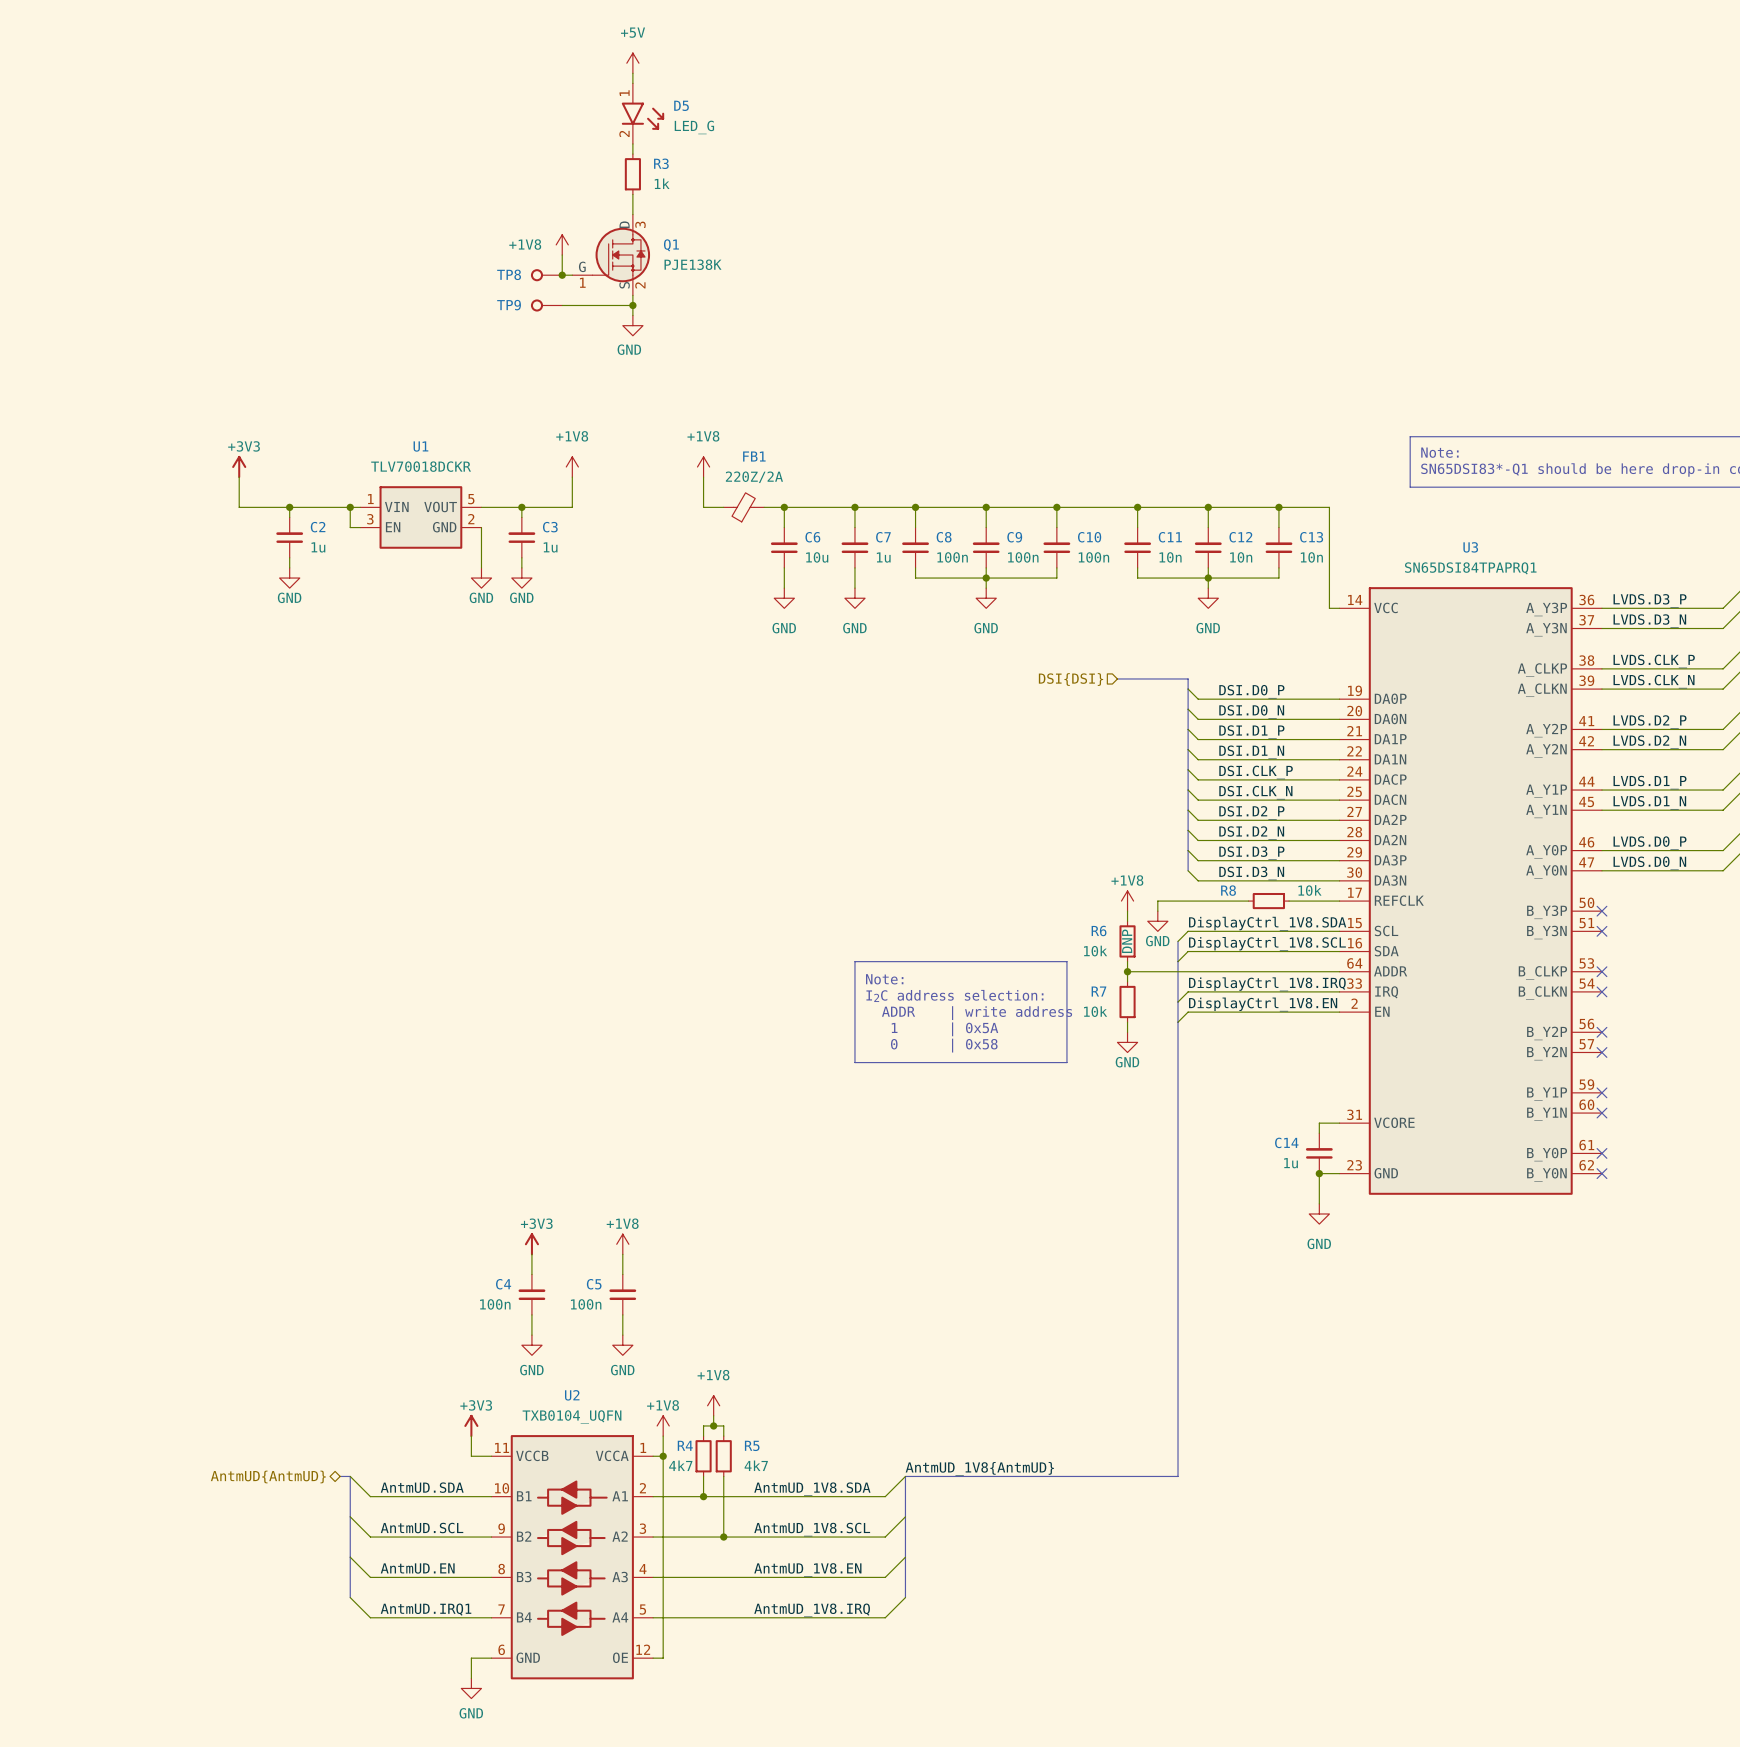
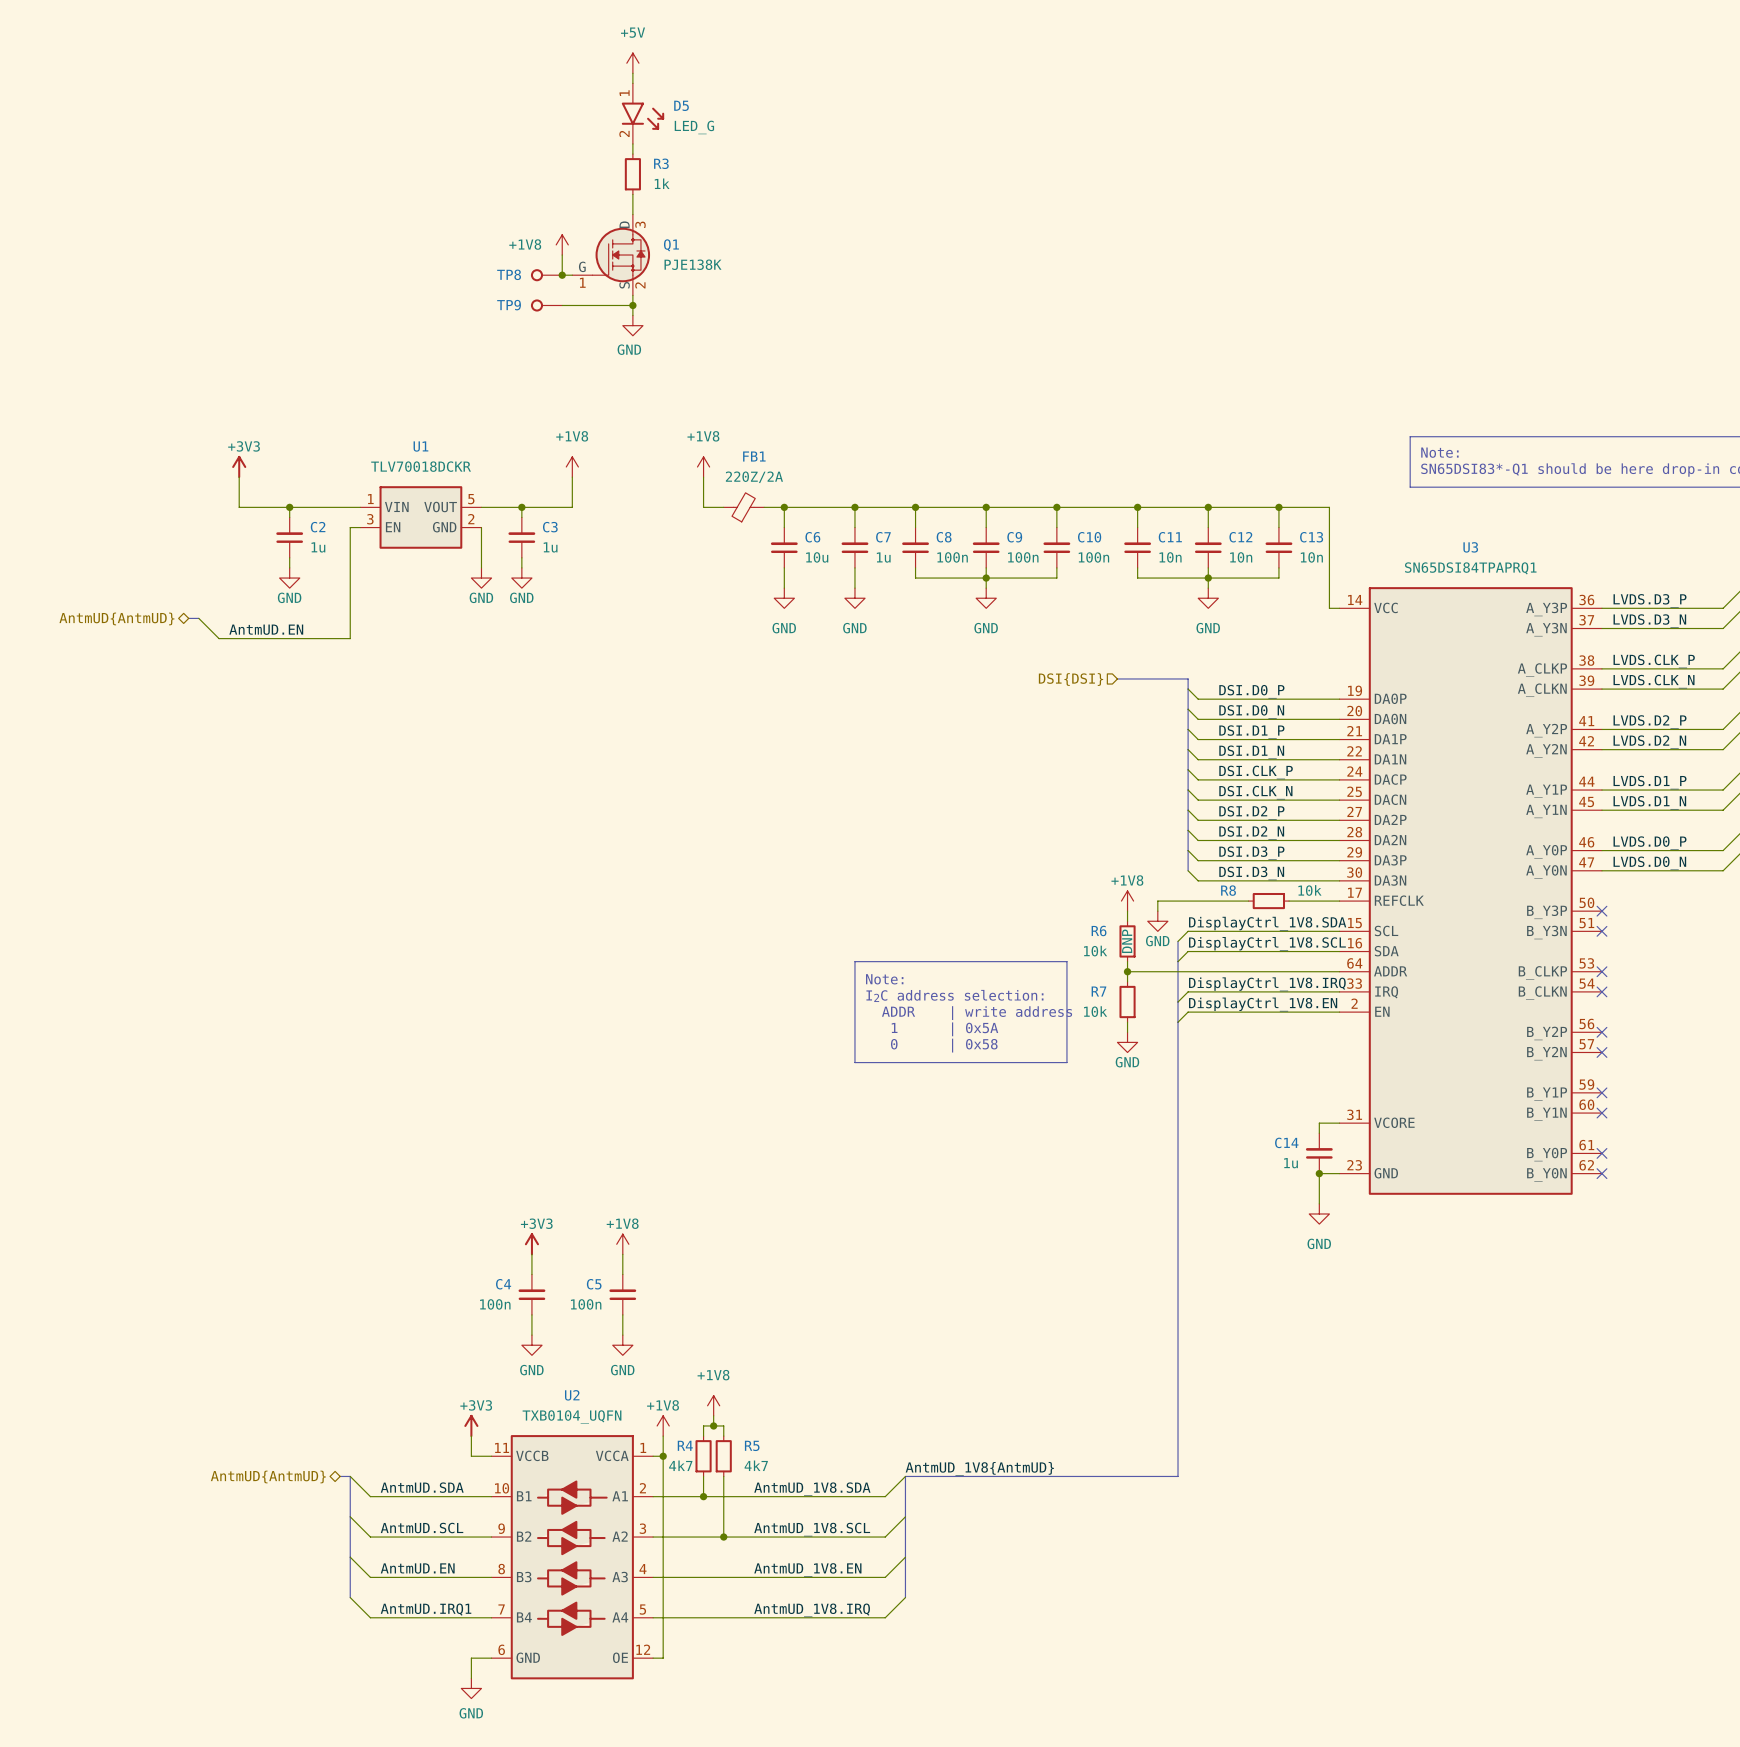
wire: (350, 507) (350, 527) -> (198, 618) (219, 638) (350, 638) (350, 527)
junction: (350, 507) -> none
hierarchical label: none -> AntmUD{AntmUD} (116, 618)
bus: none -> (188, 618) (198, 618)
label: none -> AntmUD.EN (266, 629)

